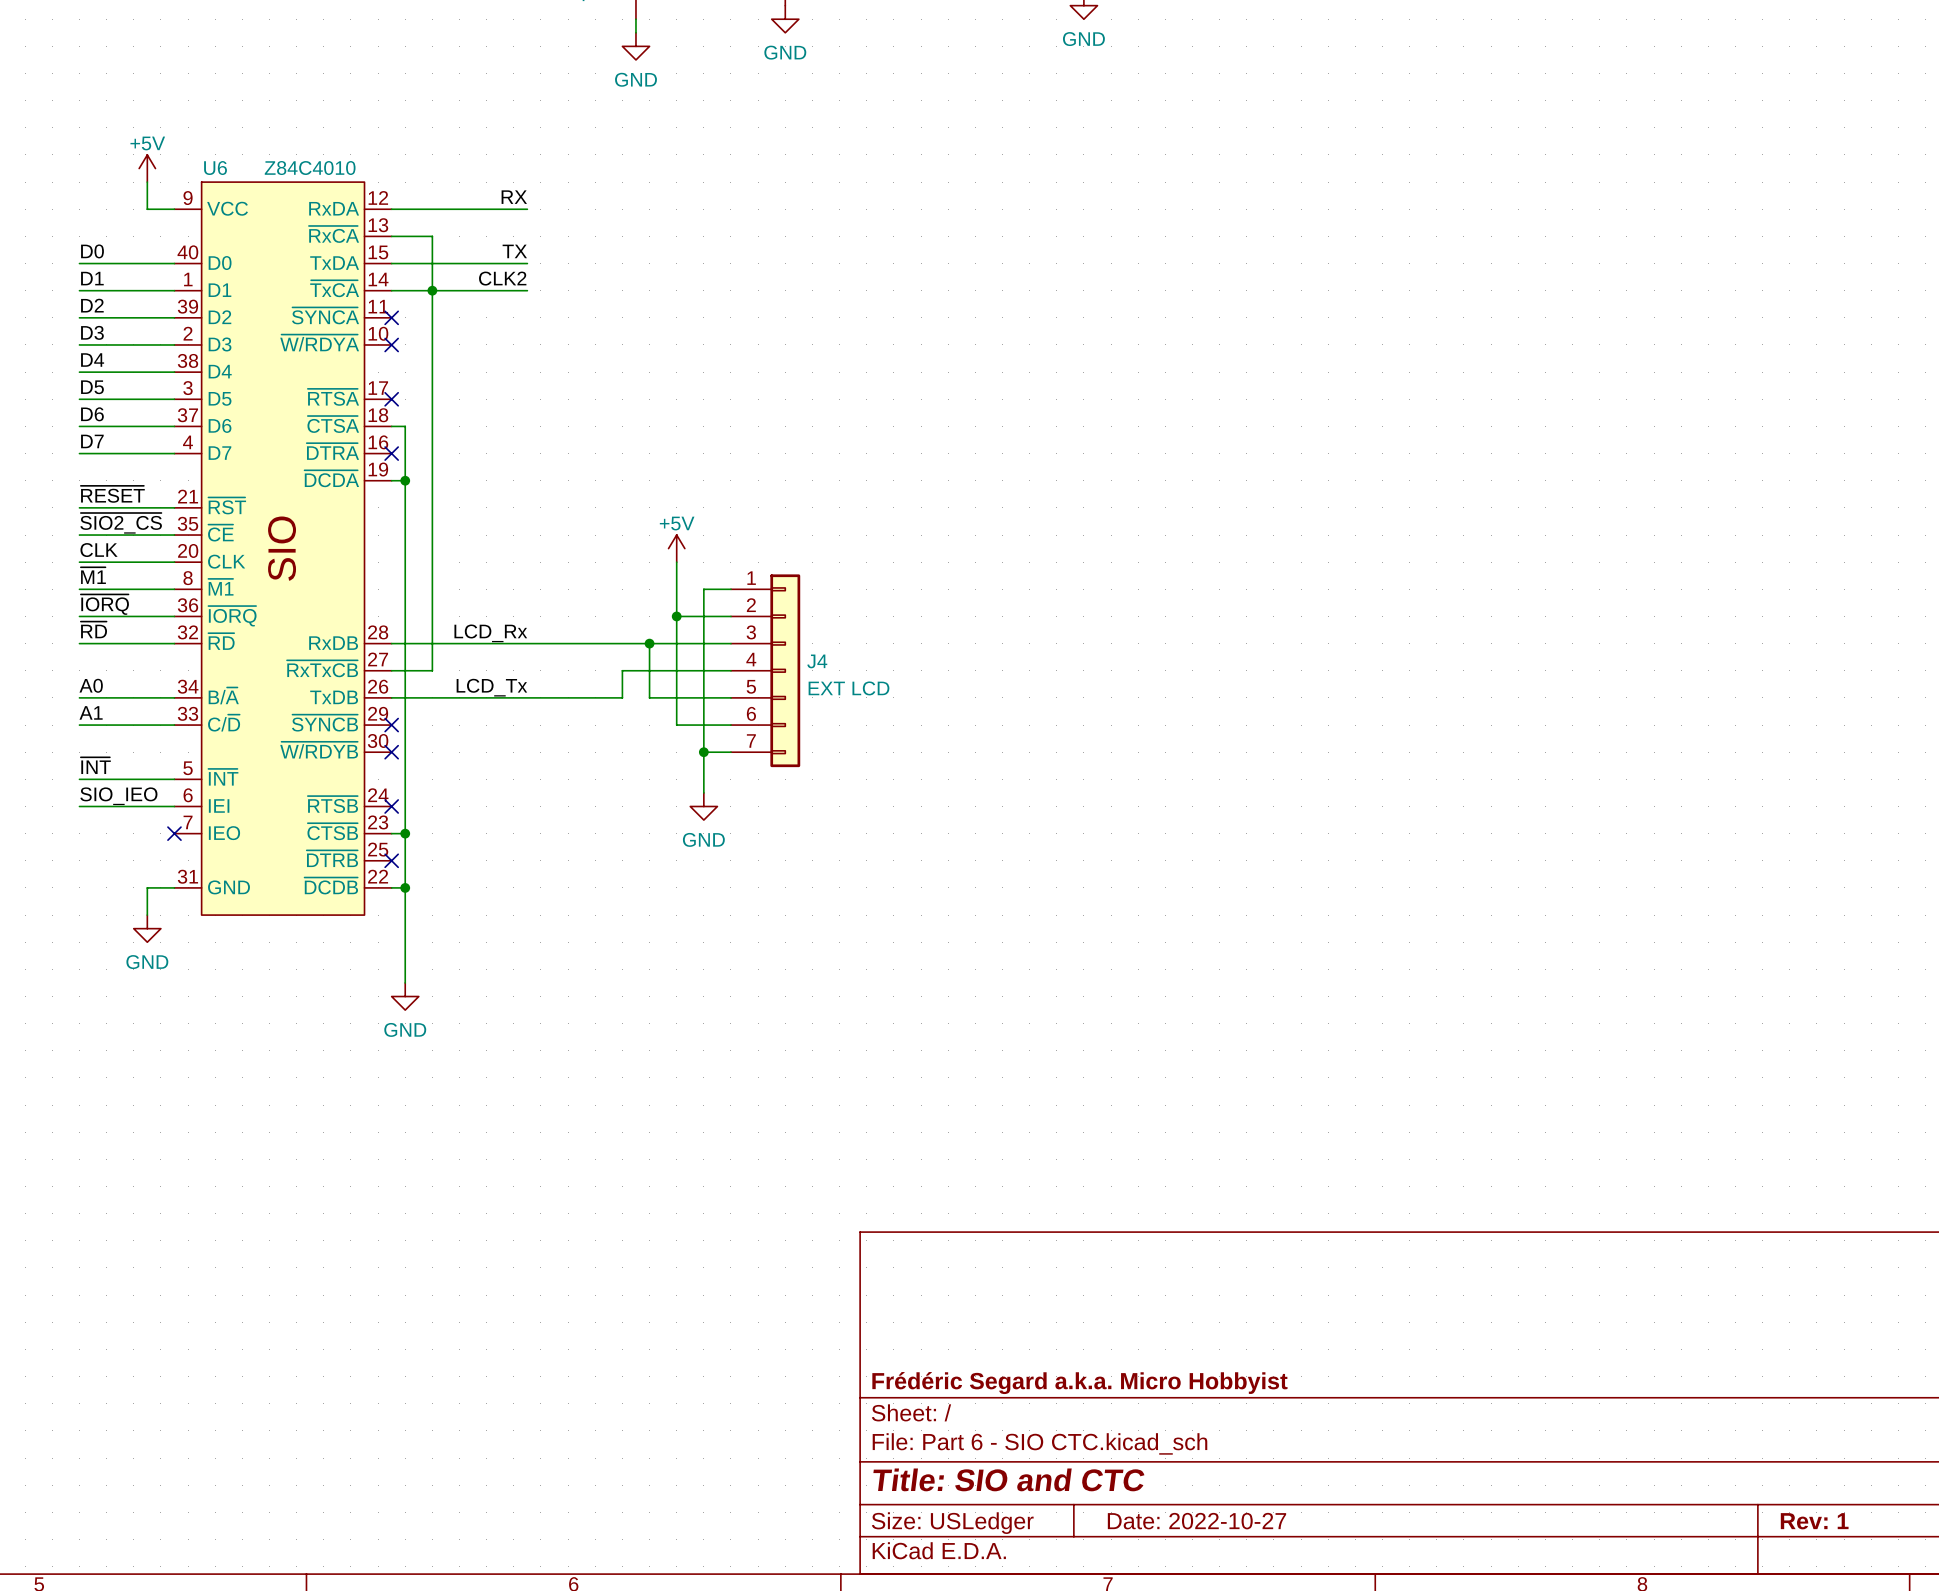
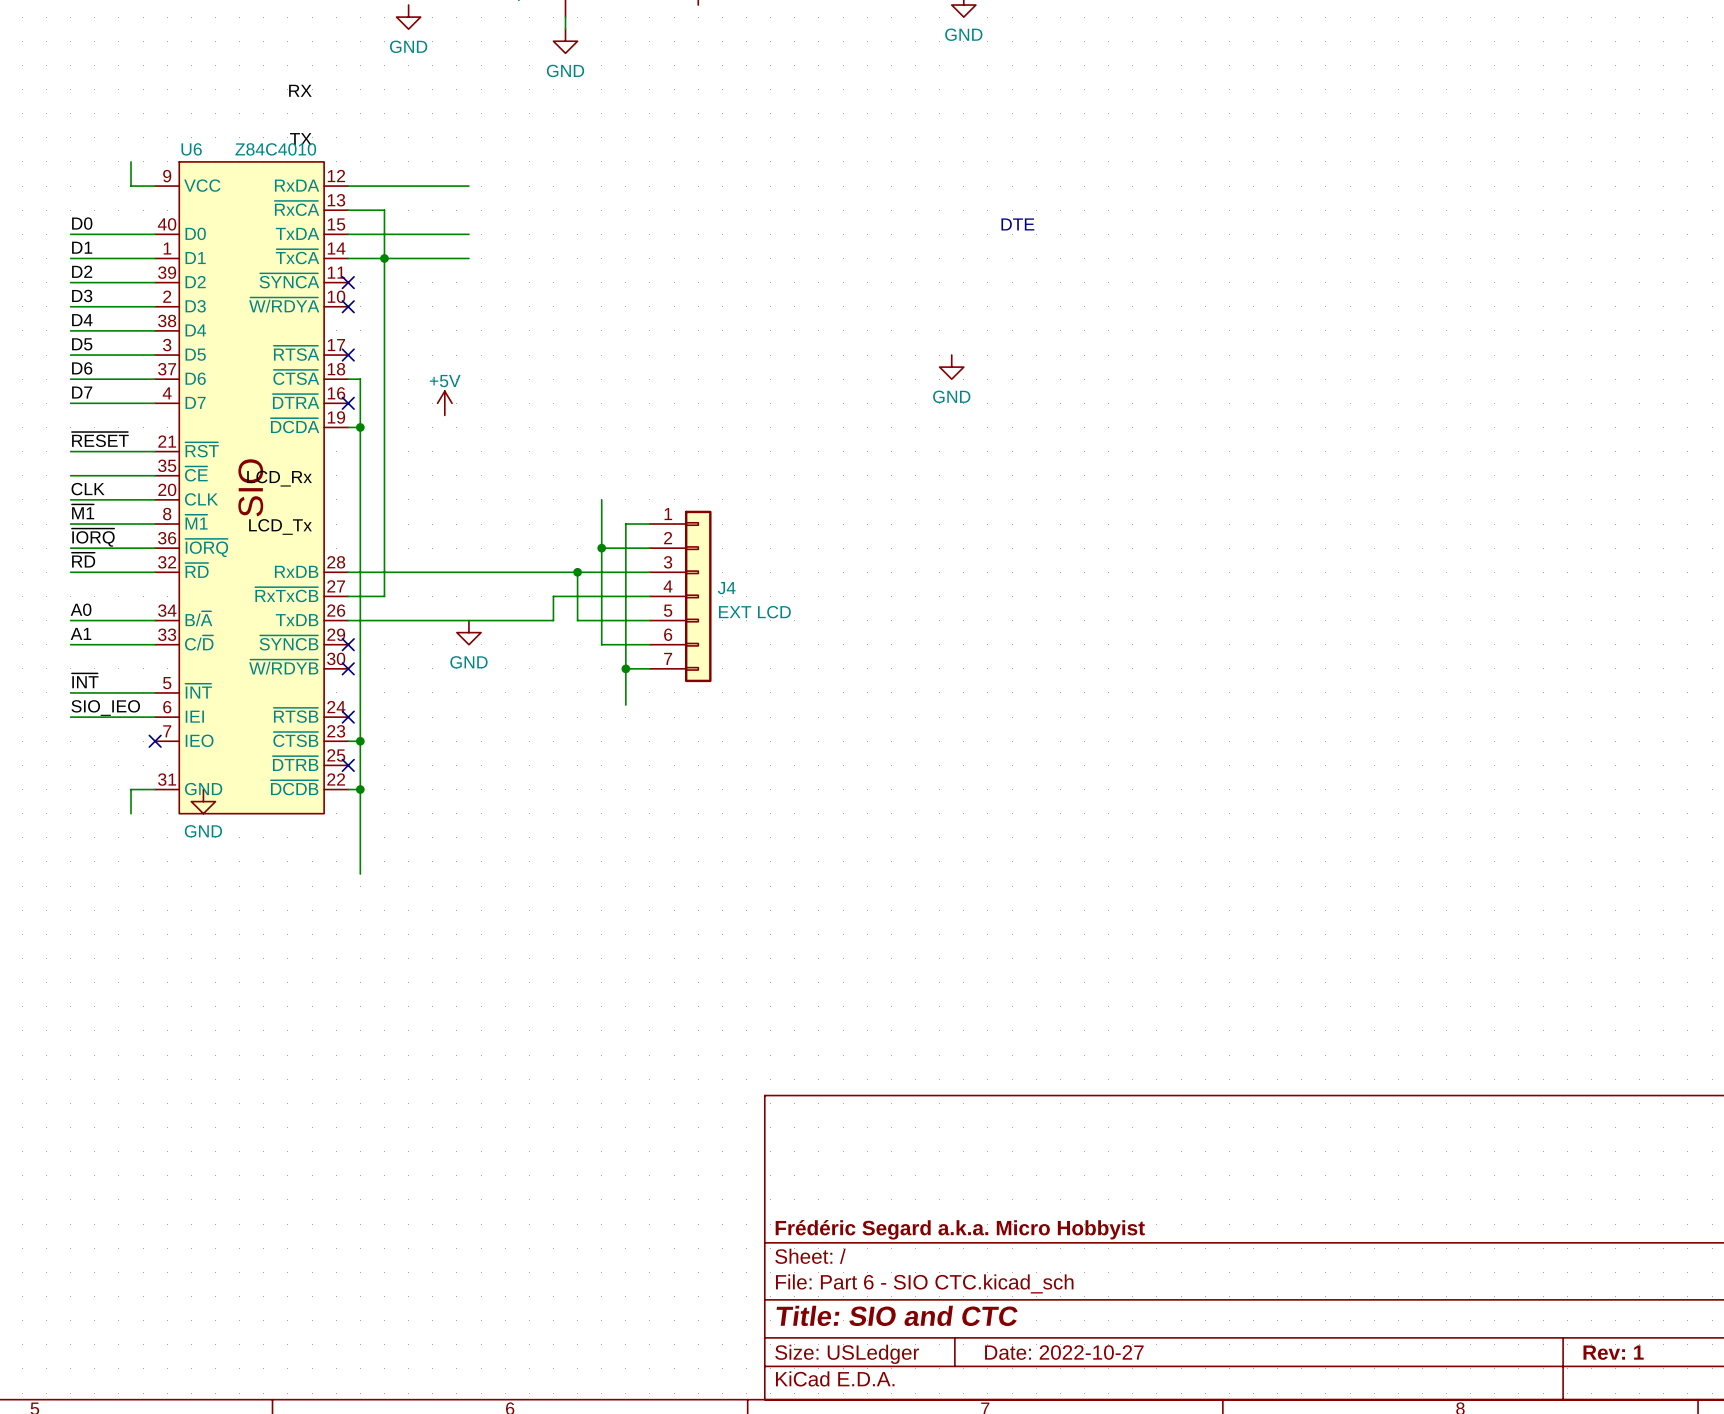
power symbol: none -> GND (408, 17)
power symbol: GND (785, 19) -> none
power symbol: +5V (147, 168) -> none
label position: RX (514, 197) -> RX (300, 90)
label position: TX (514, 251) -> TX (300, 139)
text: none -> DTE (1017, 224)
label: CLK2 (502, 278) -> none
power symbol: none -> GND (951, 367)
label: ~{SIO2_CS} (121, 523) -> none
power symbol position: +5V (676, 548) -> +5V (444, 403)
label position: LCD_Rx (490, 633) -> LCD_Rx (279, 478)
label position: LCD_Tx (491, 687) -> LCD_Tx (280, 526)
power symbol: none -> GND (468, 632)
power symbol: GND (703, 806) -> none
power symbol position: GND (147, 928) -> GND (203, 801)
power symbol: GND (405, 996) -> none

